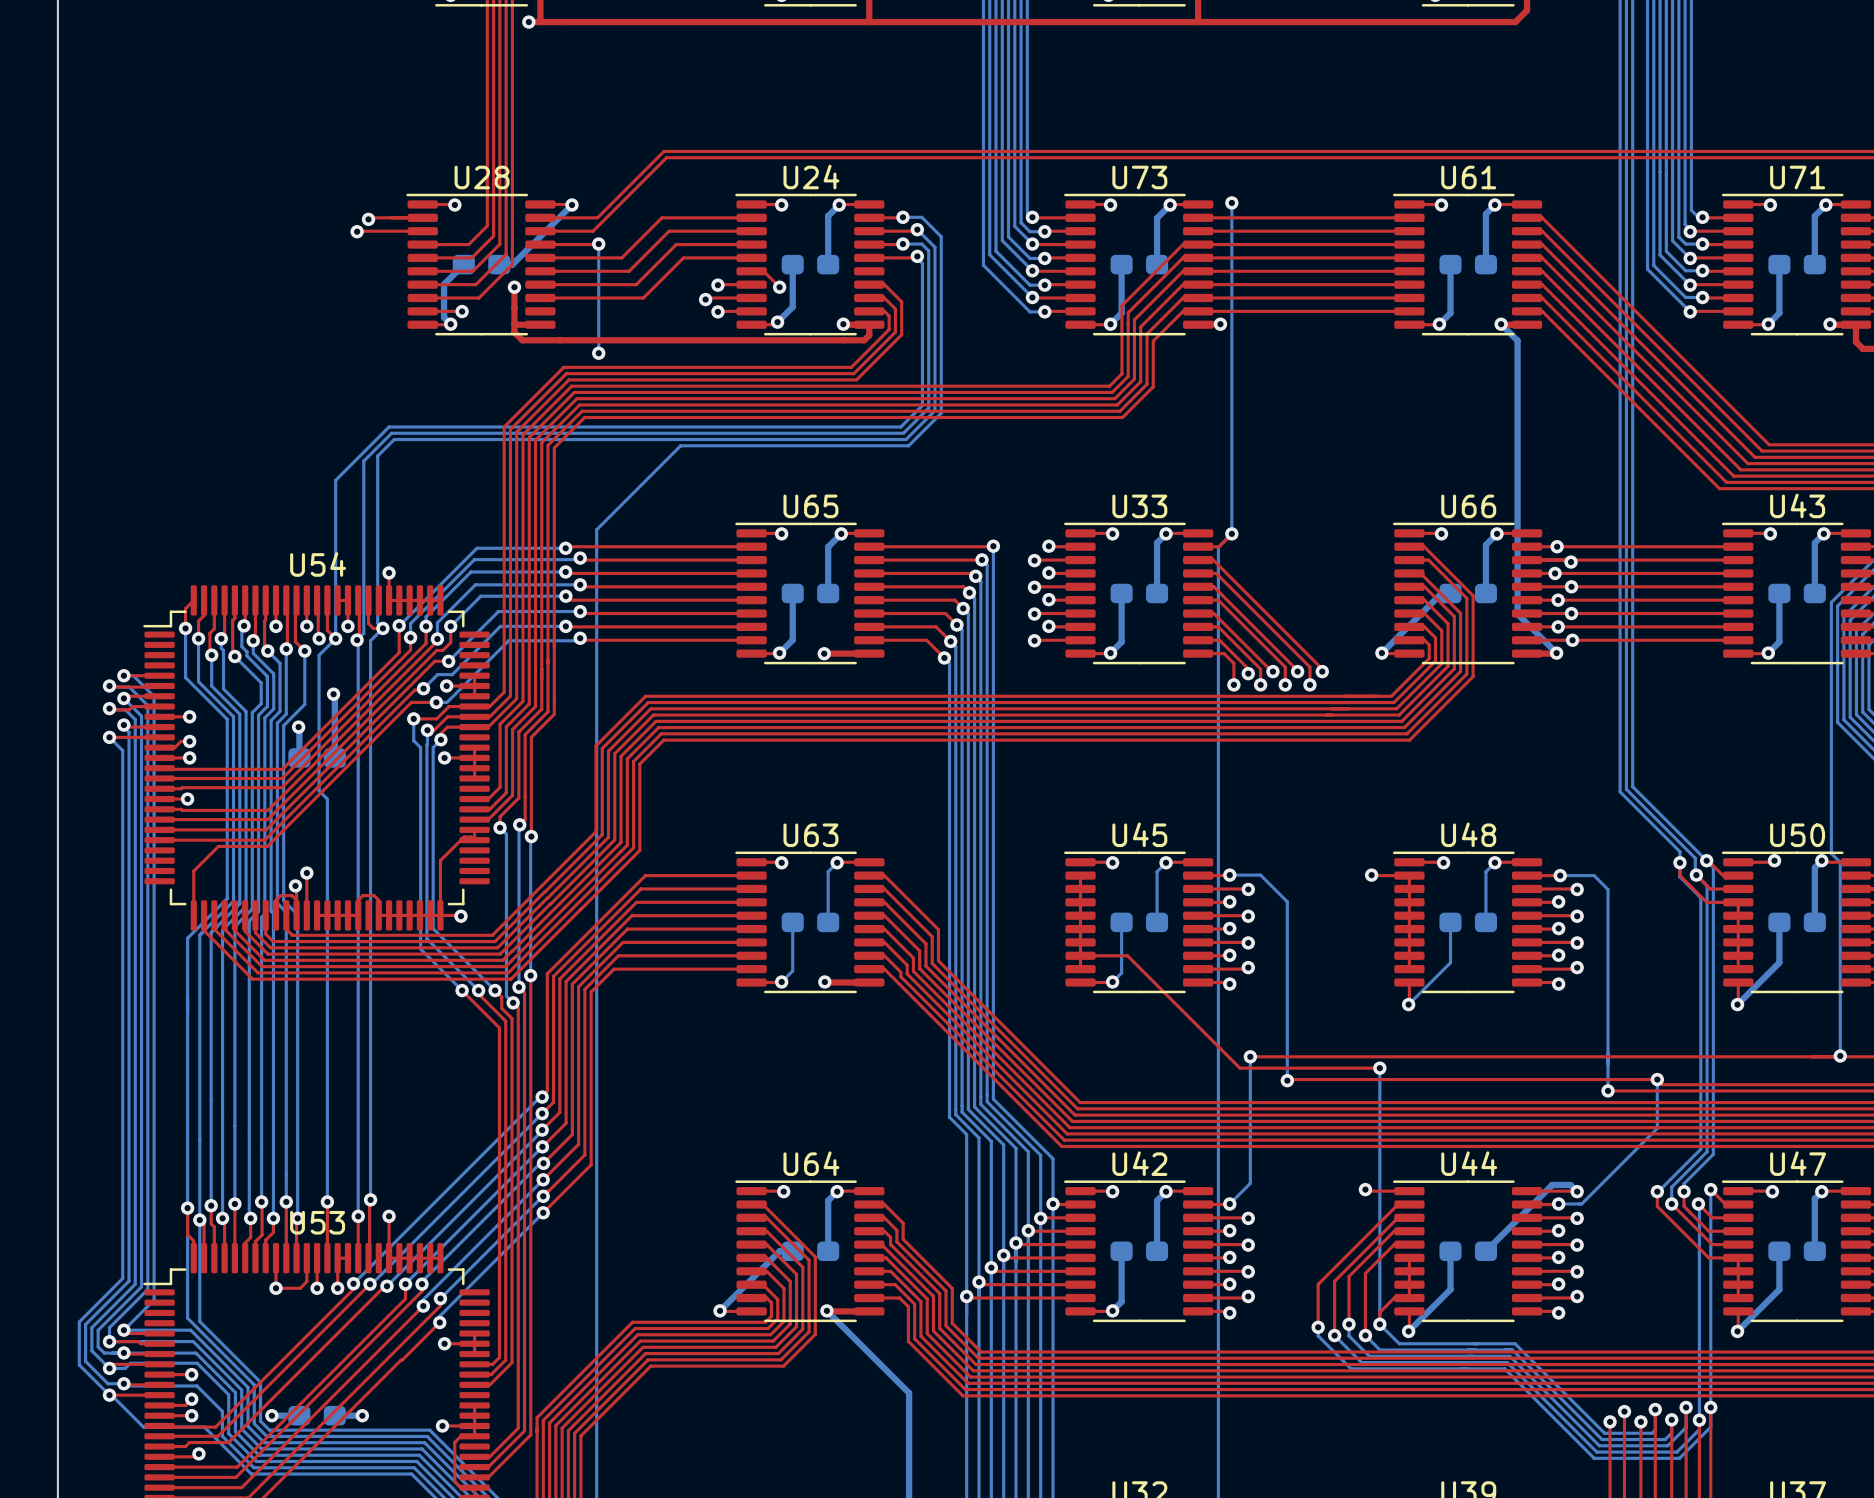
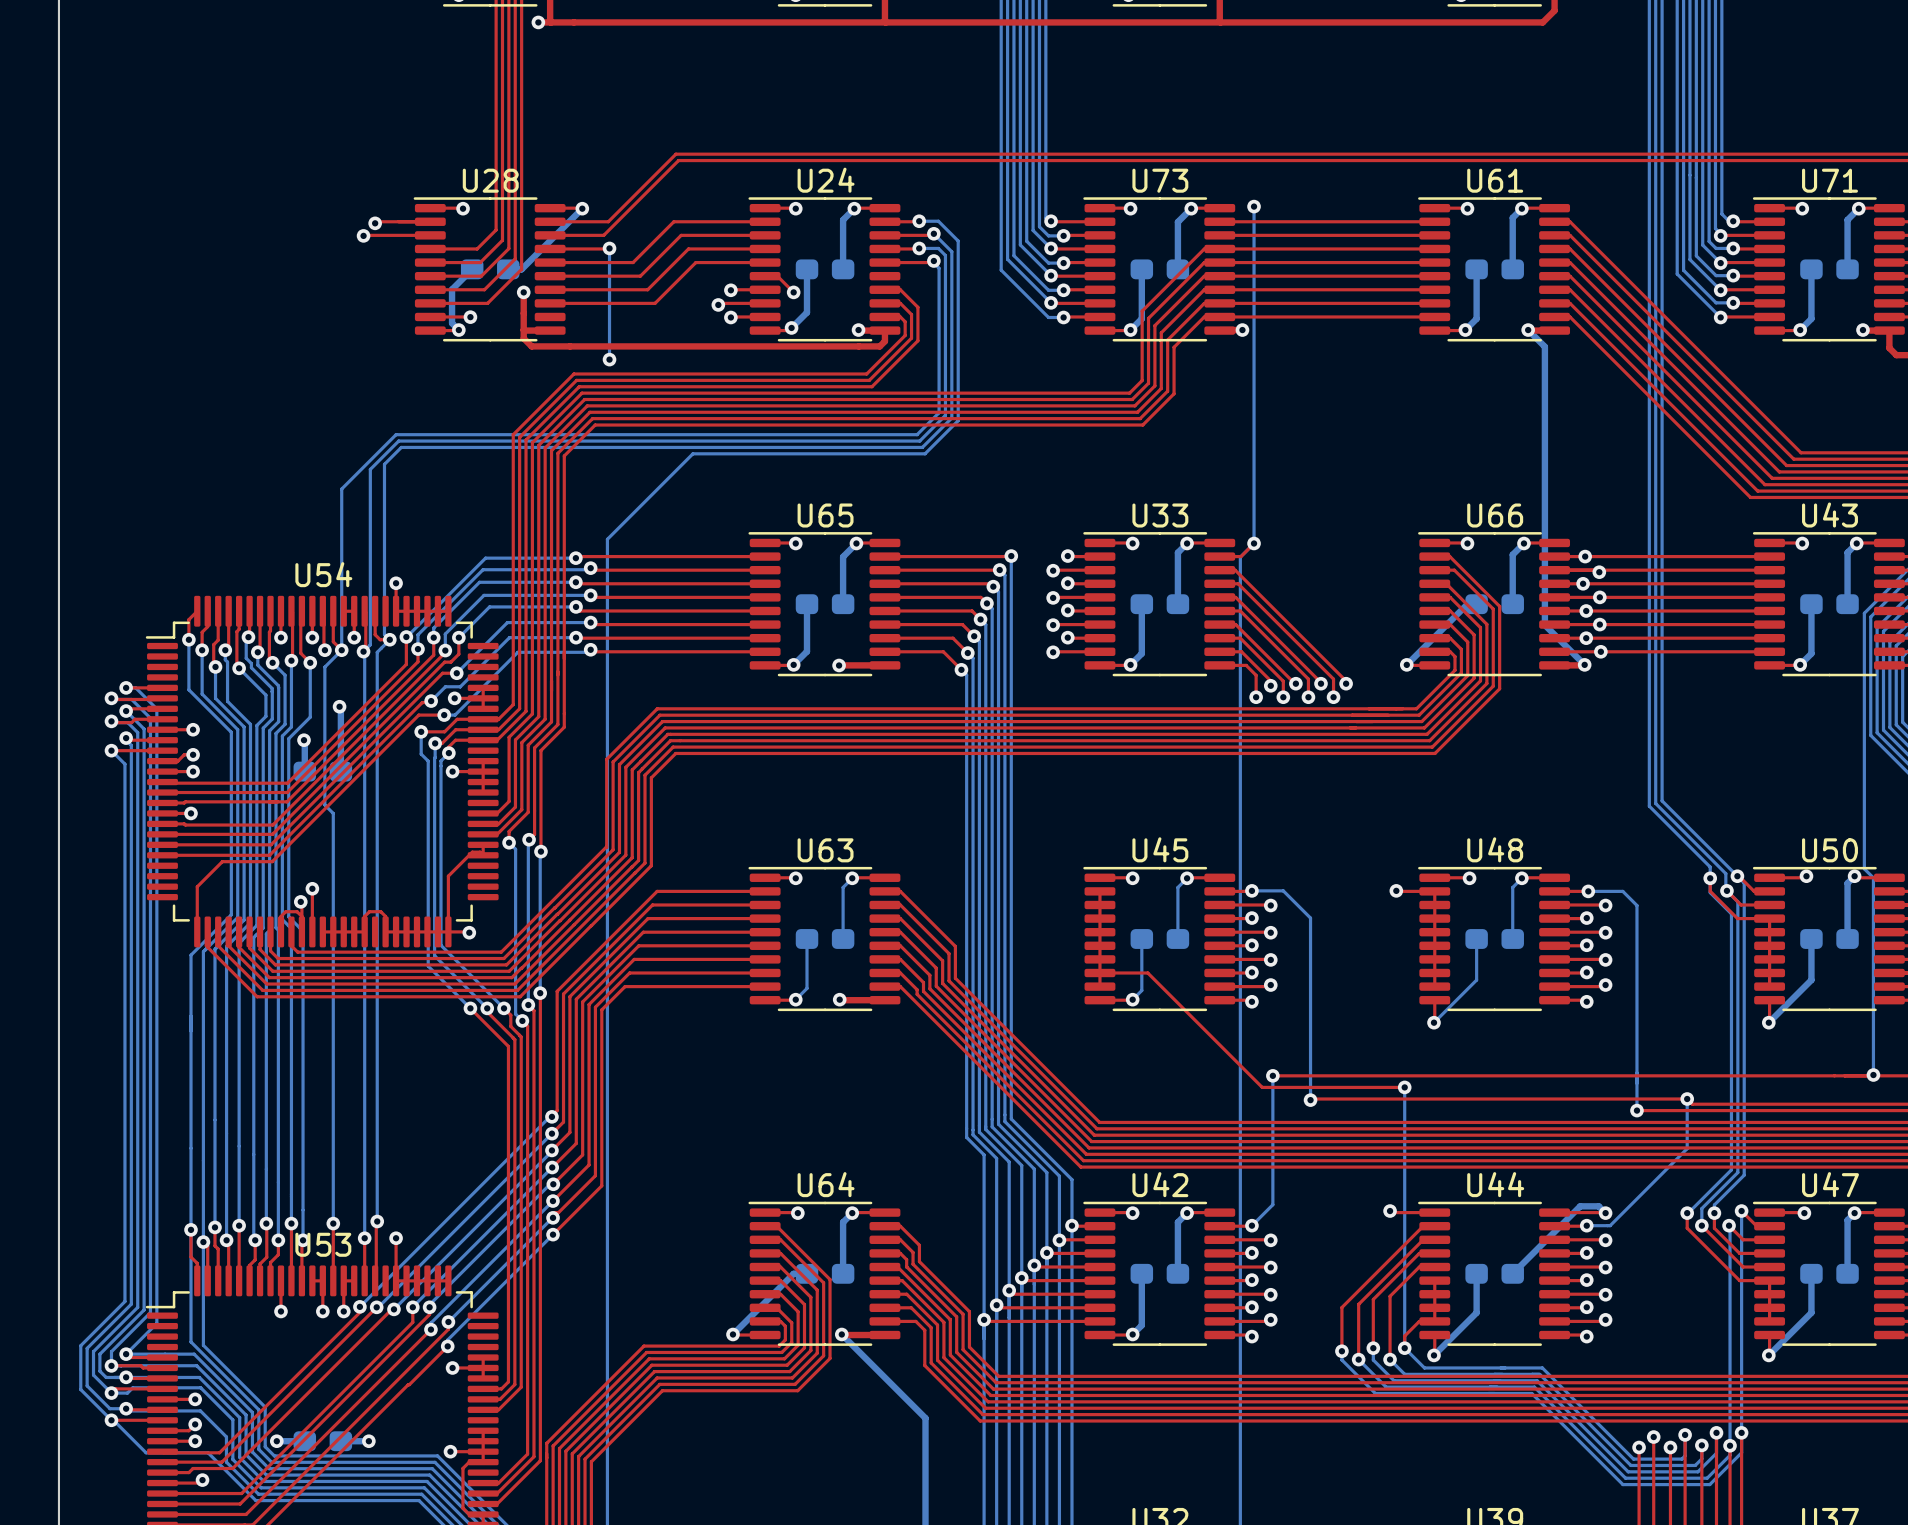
top track: (306, 1258) (306, 1281) (300, 1288) (276, 1288) -> (312, 1280) (322, 1280)

